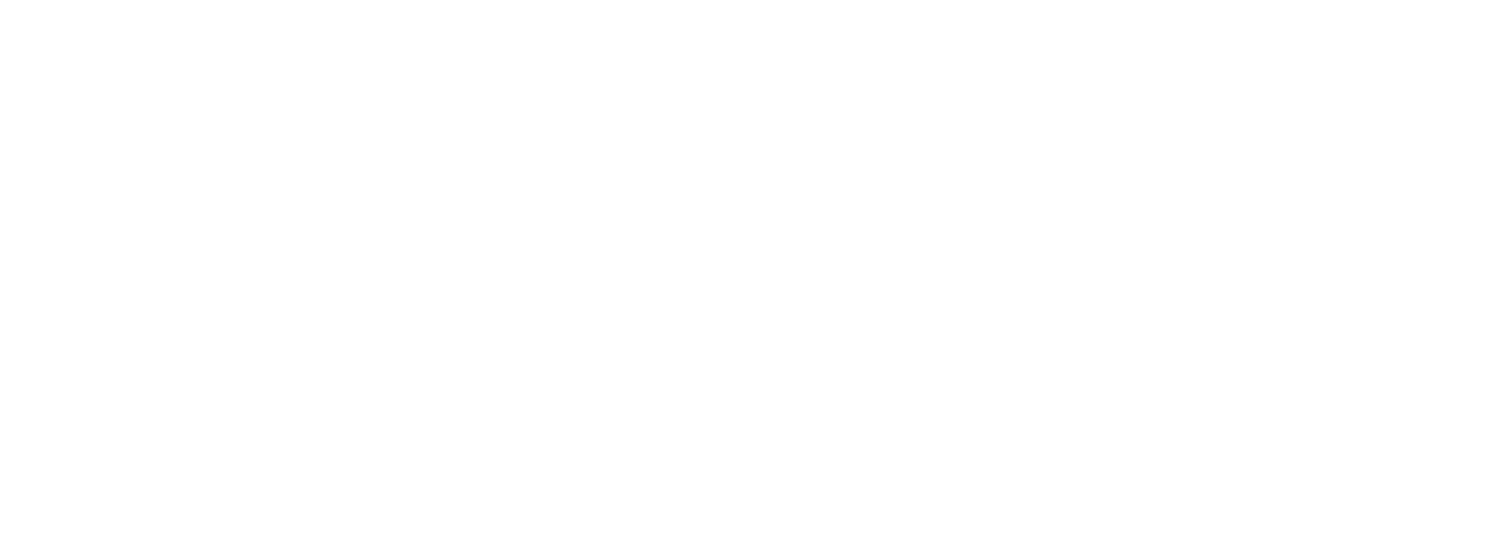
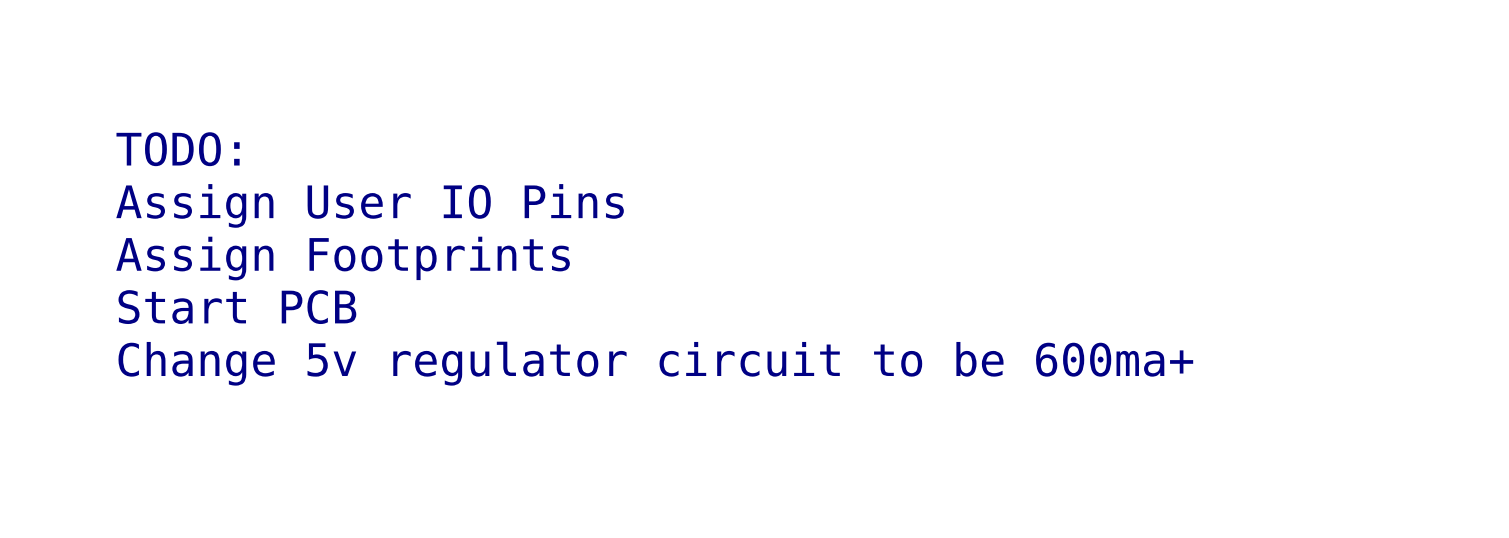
text: none -> TODO: (178, 149)
text: none -> Assign User IO Pins (370, 205)
text: none -> Assign Footprints (343, 258)
text: none -> Start PCB (237, 307)
text: none -> Change 5v regulator circuit to be 600ma+ (655, 363)

